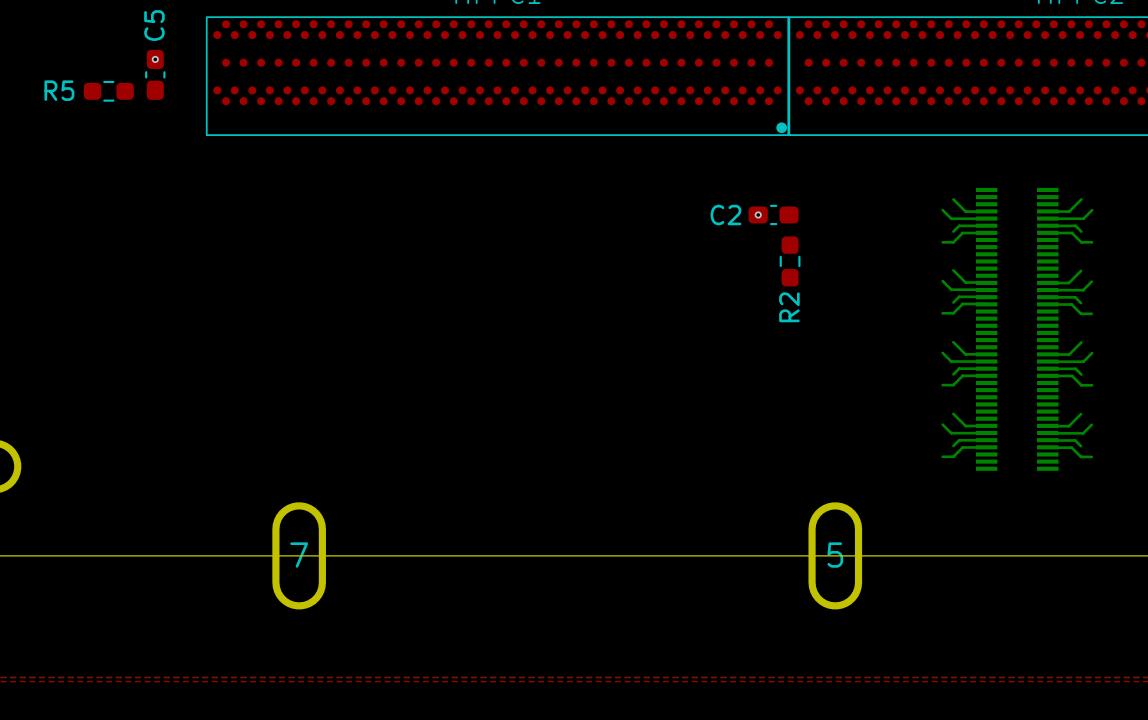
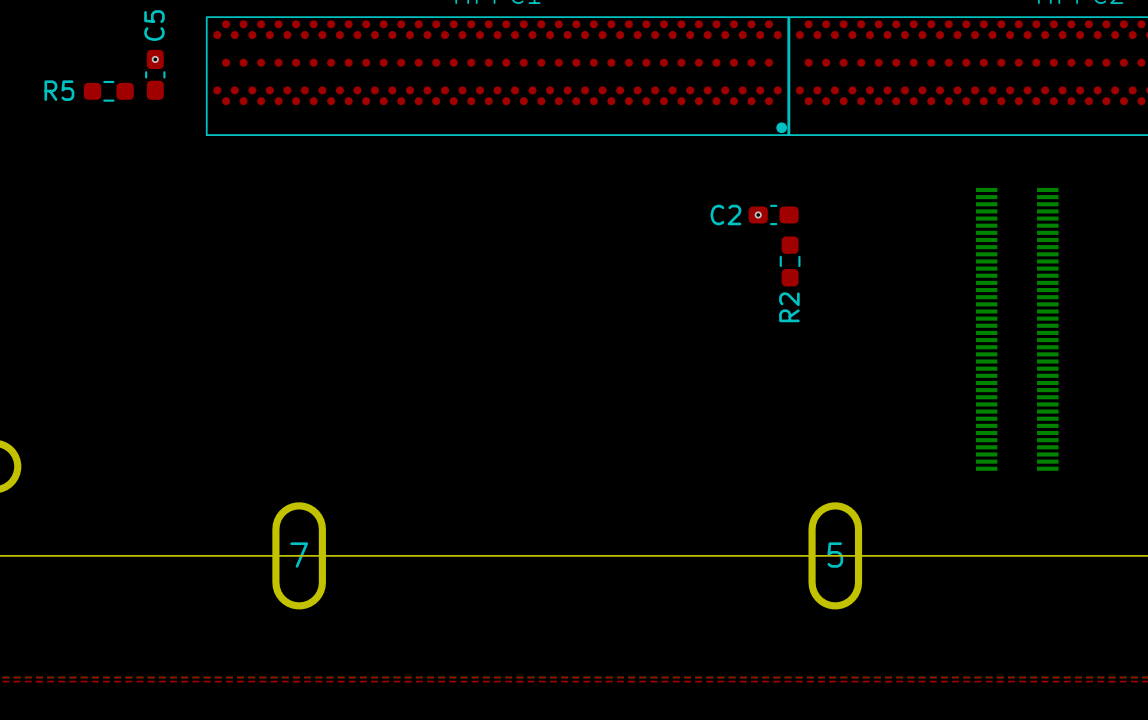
bottom track: (953, 199) (965, 211) (986, 211) -> none
bottom track: (1081, 199) (1069, 211) (1048, 211) -> none
bottom track: (942, 210) (951, 218) (986, 218) -> none
bottom track: (1092, 210) (1083, 218) (1048, 218) -> none
bottom track: (986, 225) (959, 225) (953, 231) -> none
bottom track: (1048, 225) (1075, 225) (1081, 231) -> none
bottom track: (986, 233) (962, 233) (953, 242) (942, 242) -> none
bottom track: (1048, 233) (1072, 233) (1081, 242) (1092, 242) -> none
bottom track: (953, 270) (965, 282) (986, 282) -> none
bottom track: (1081, 270) (1068, 283) (1047, 283) -> none
bottom track: (942, 281) (951, 289) (986, 289) -> none
bottom track: (1091, 281) (1083, 290) (1047, 290) -> none
bottom track: (986, 296) (959, 296) (953, 302) -> none
bottom track: (1047, 297) (1075, 297) (1081, 303) -> none
bottom track: (986, 303) (962, 303) (953, 313) (942, 313) -> none
bottom track: (1047, 304) (1071, 304) (1081, 313) (1091, 313) -> none
bottom track: (953, 342) (965, 354) (986, 354) -> none
bottom track: (1081, 342) (1069, 354) (1048, 354) -> none
bottom track: (942, 352) (951, 361) (986, 361) -> none
bottom track: (1092, 353) (1083, 361) (1048, 361) -> none
bottom track: (986, 368) (959, 368) (953, 374) -> none
bottom track: (1048, 368) (1075, 368) (1081, 374) -> none
bottom track: (986, 375) (962, 375) (953, 385) (942, 385) -> none
bottom track: (1048, 375) (1072, 375) (1081, 385) (1092, 385) -> none
bottom track: (953, 413) (965, 426) (986, 426) -> none
bottom track: (1081, 414) (1068, 426) (1047, 426) -> none
bottom track: (942, 424) (951, 433) (986, 433) -> none
bottom track: (1091, 424) (1083, 433) (1047, 433) -> none
bottom track: (986, 440) (959, 440) (953, 446) -> none
bottom track: (1047, 440) (1075, 440) (1081, 446) -> none
bottom track: (986, 447) (962, 447) (953, 456) (942, 456) -> none
bottom track: (1047, 447) (1071, 447) (1081, 456) (1091, 456) -> none

